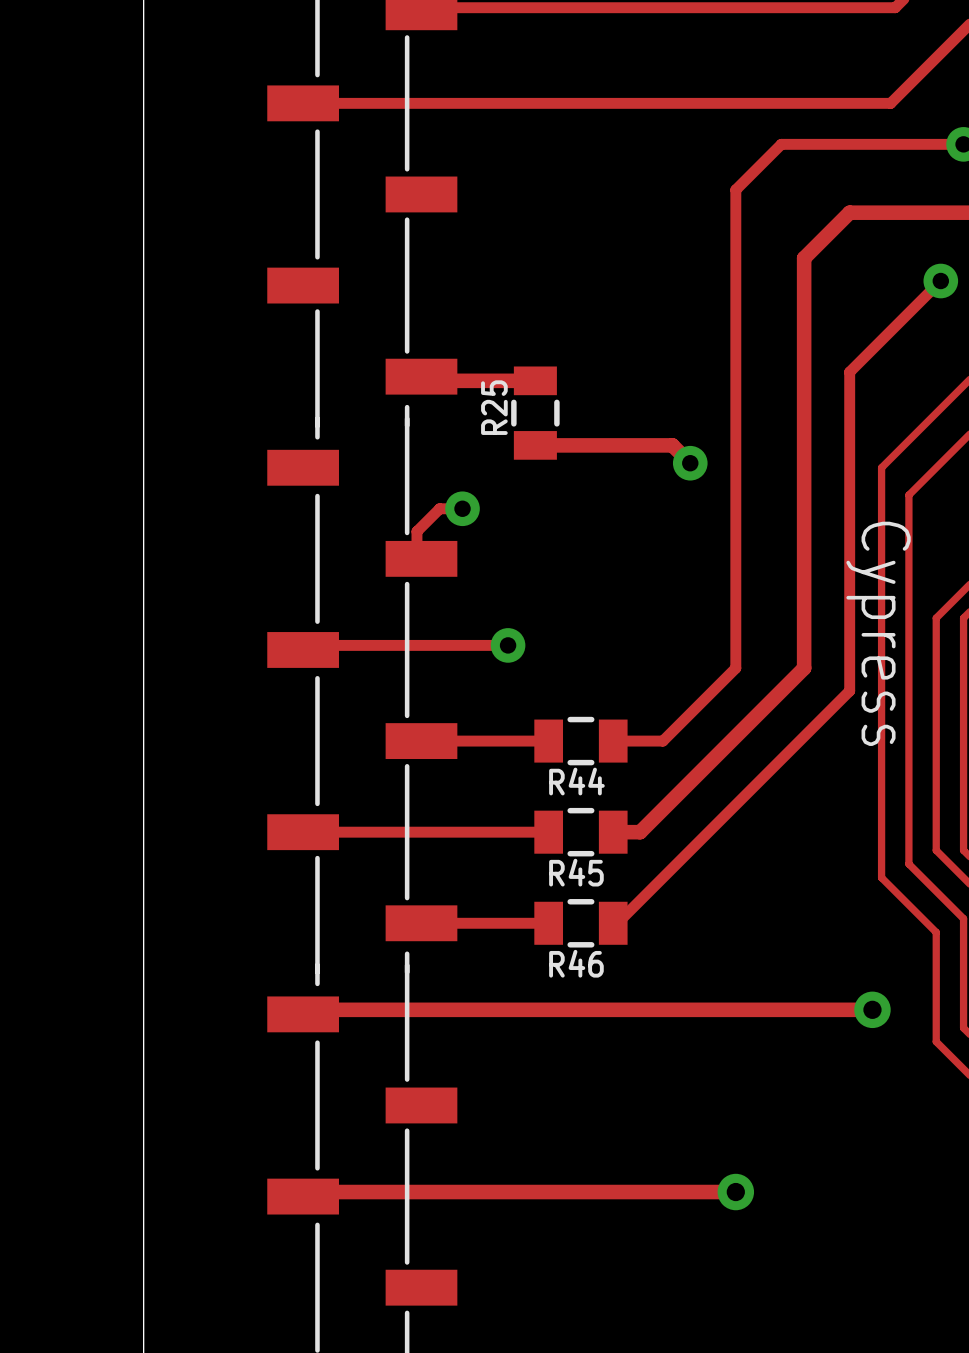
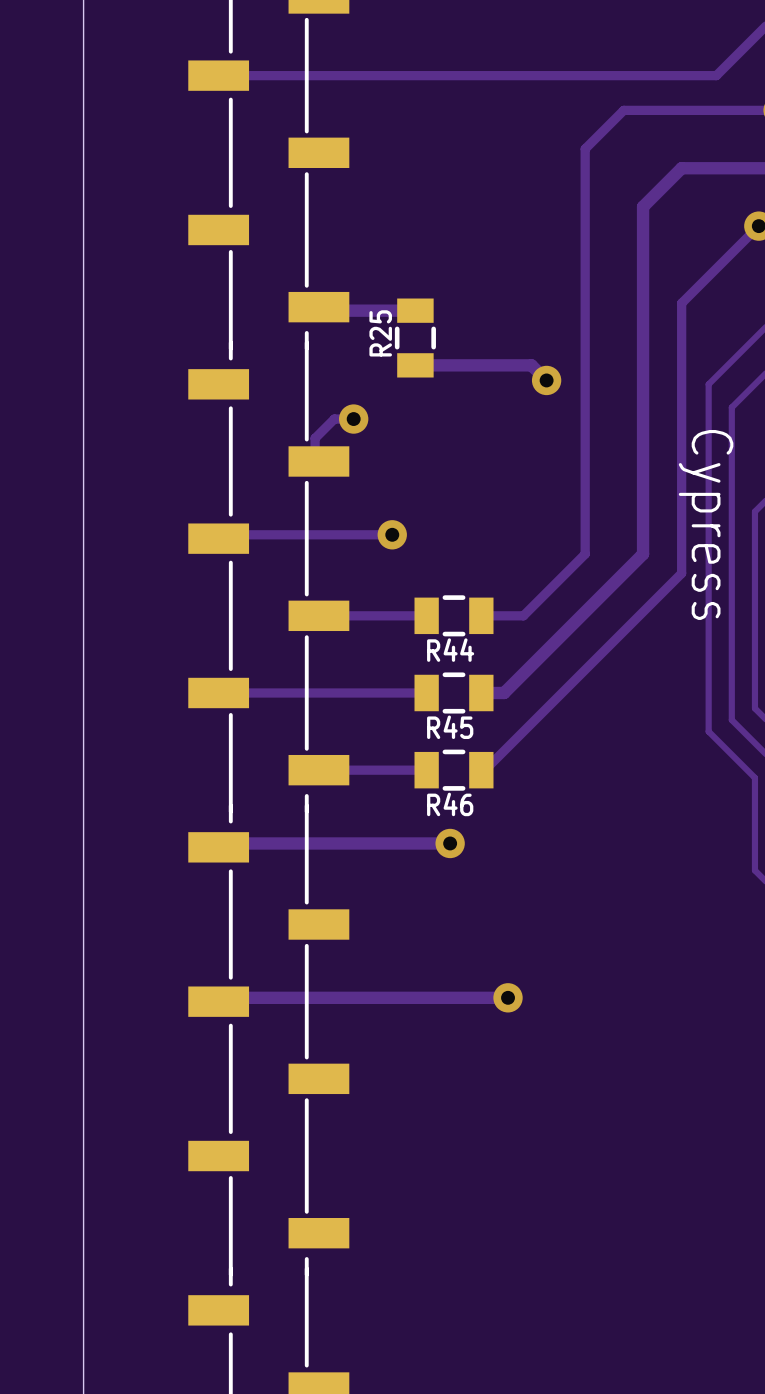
track: (576, 1009) (872, 1009) -> none
via: none -> (450, 843)
via: (872, 1009) -> none
track: (644, 1192) (735, 1192) -> none
via: none -> (508, 997)
via: (735, 1192) -> none

